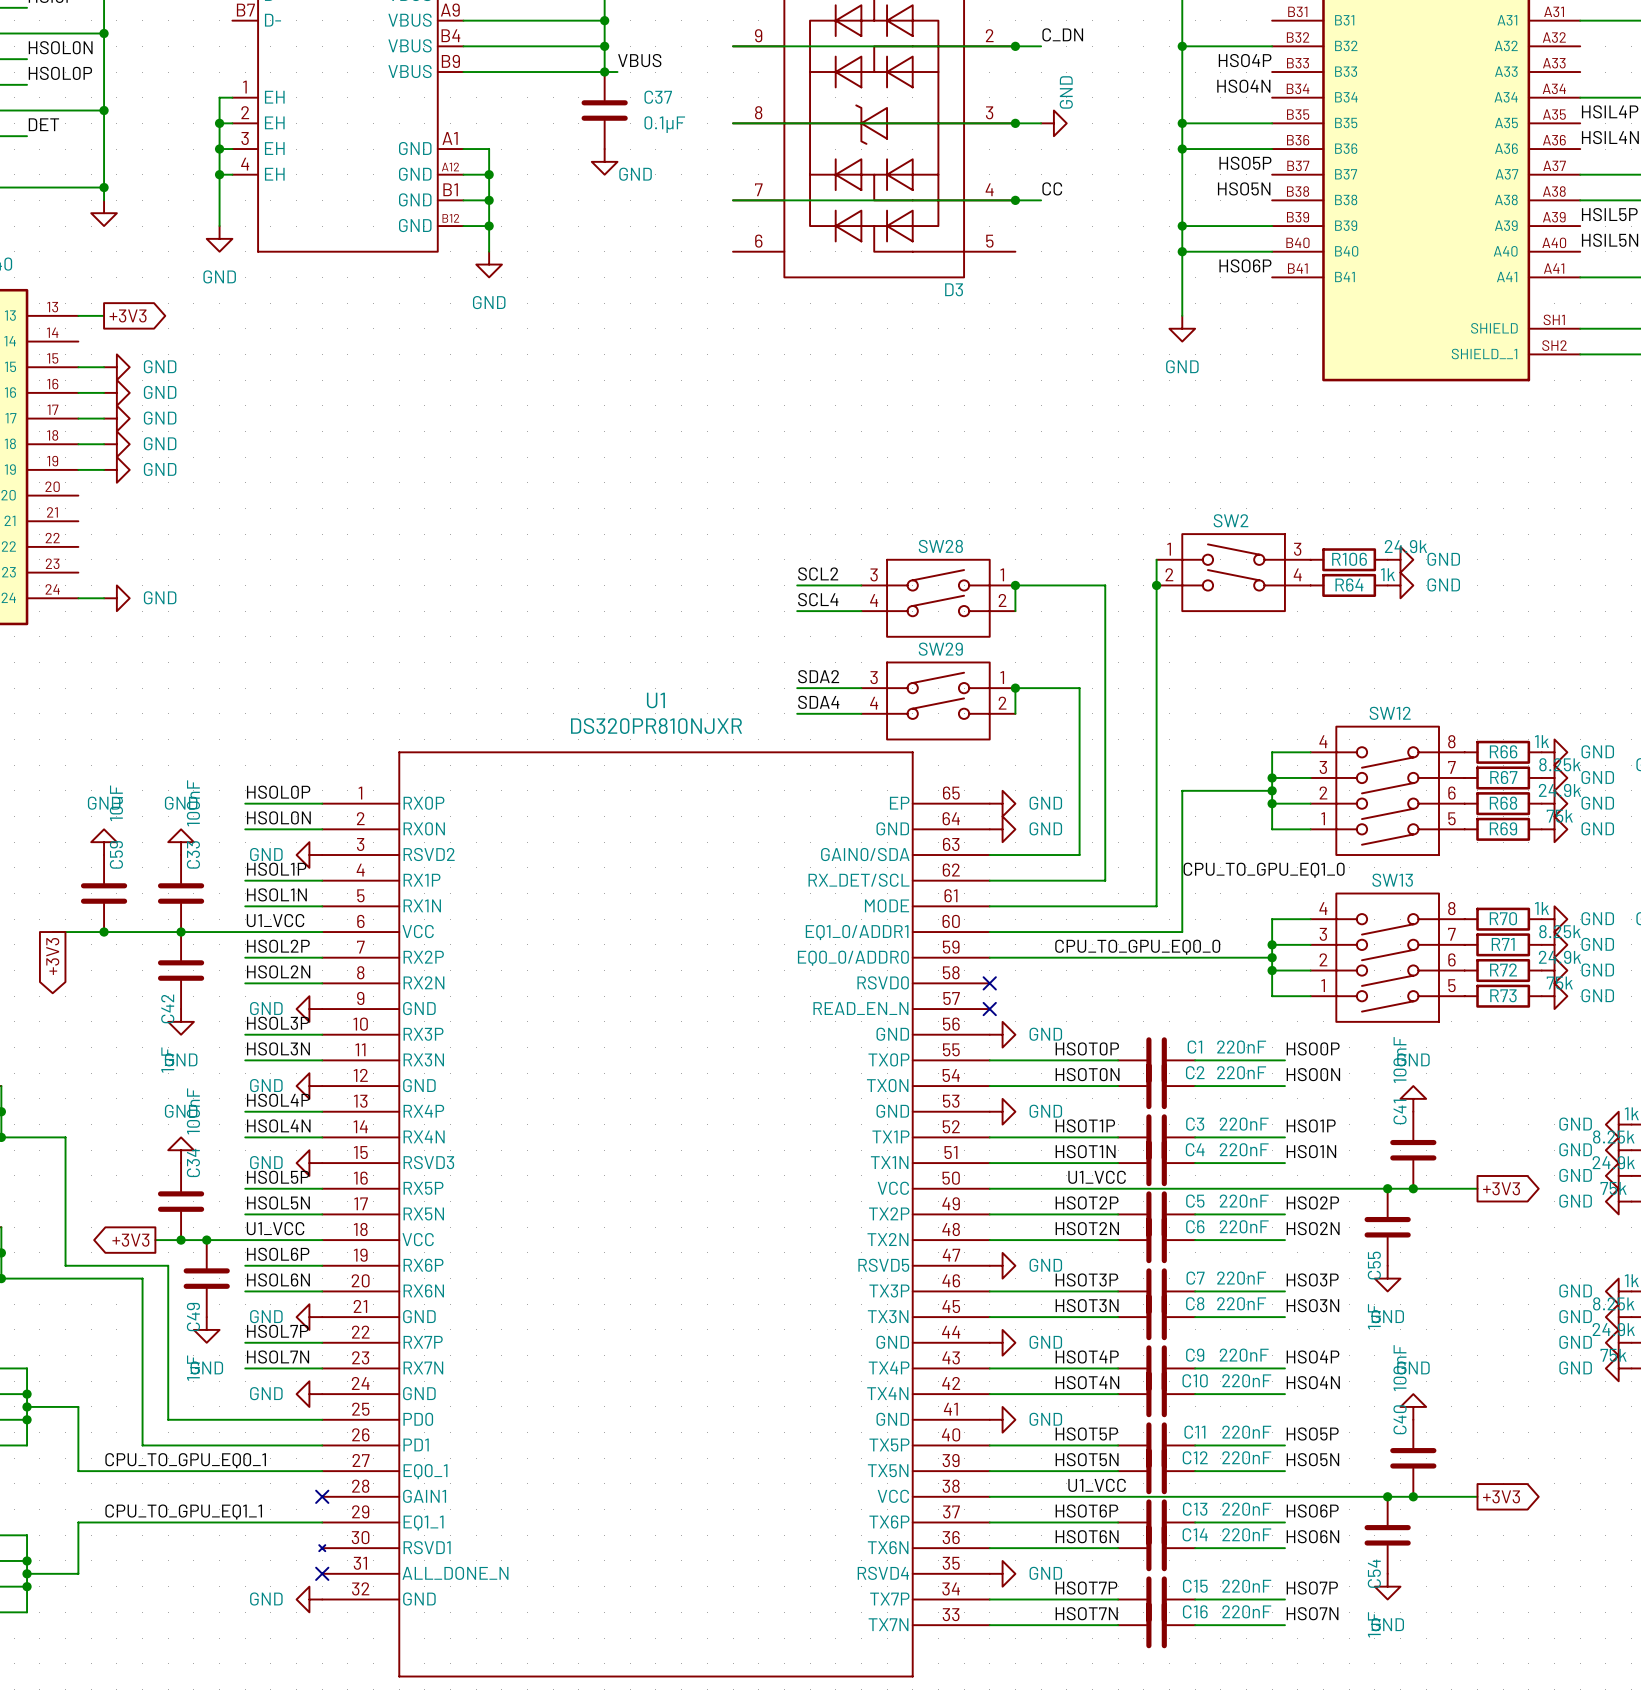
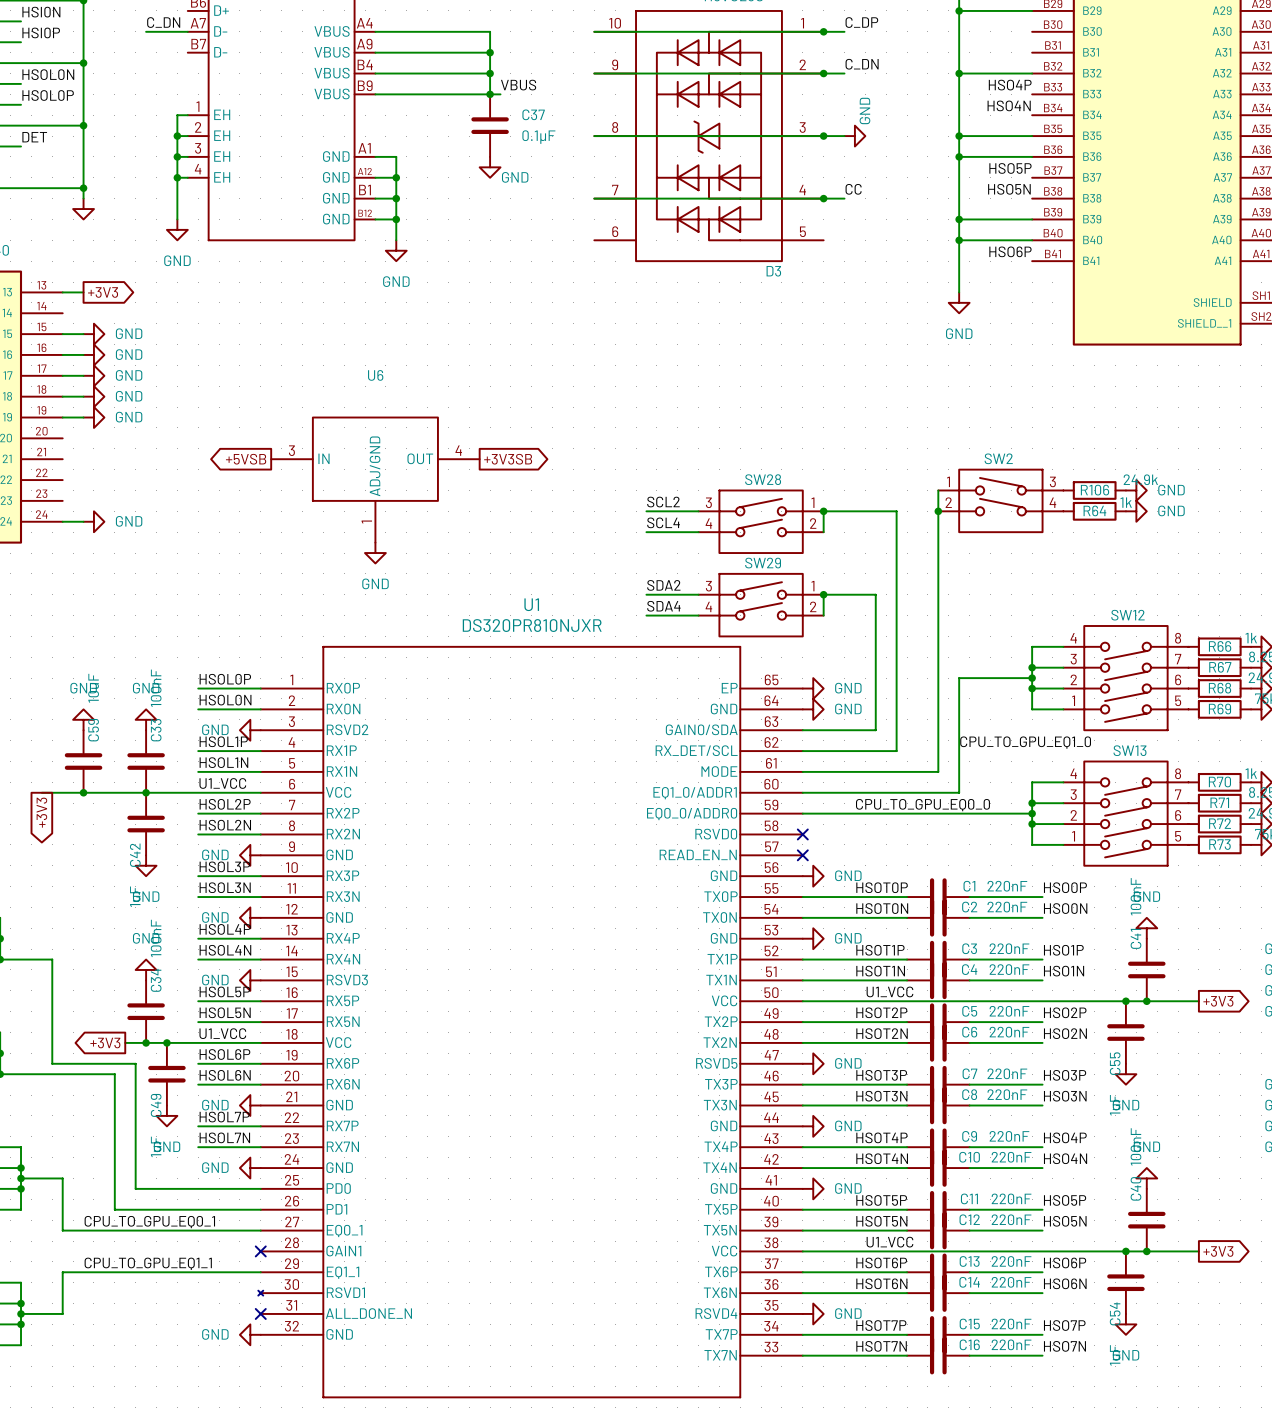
global label: none -> +5VSB (246, 459)
global label: none -> +3V3SB (508, 459)
U6: none -> (375, 480)
power symbol: none -> GND (375, 553)

